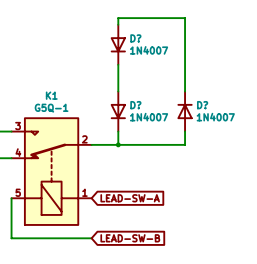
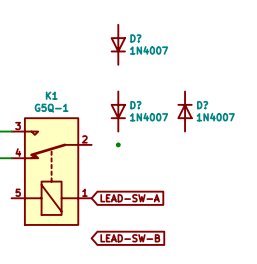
wire: (118, 24) (118, 18) (185, 18) (185, 91) -> none
wire: (118, 64) (118, 91) -> none
wire: (118, 131) (118, 144) -> none
wire: (185, 131) (185, 144) (91, 144) -> none
wire: (11, 198) (11, 238) (91, 238) -> none

